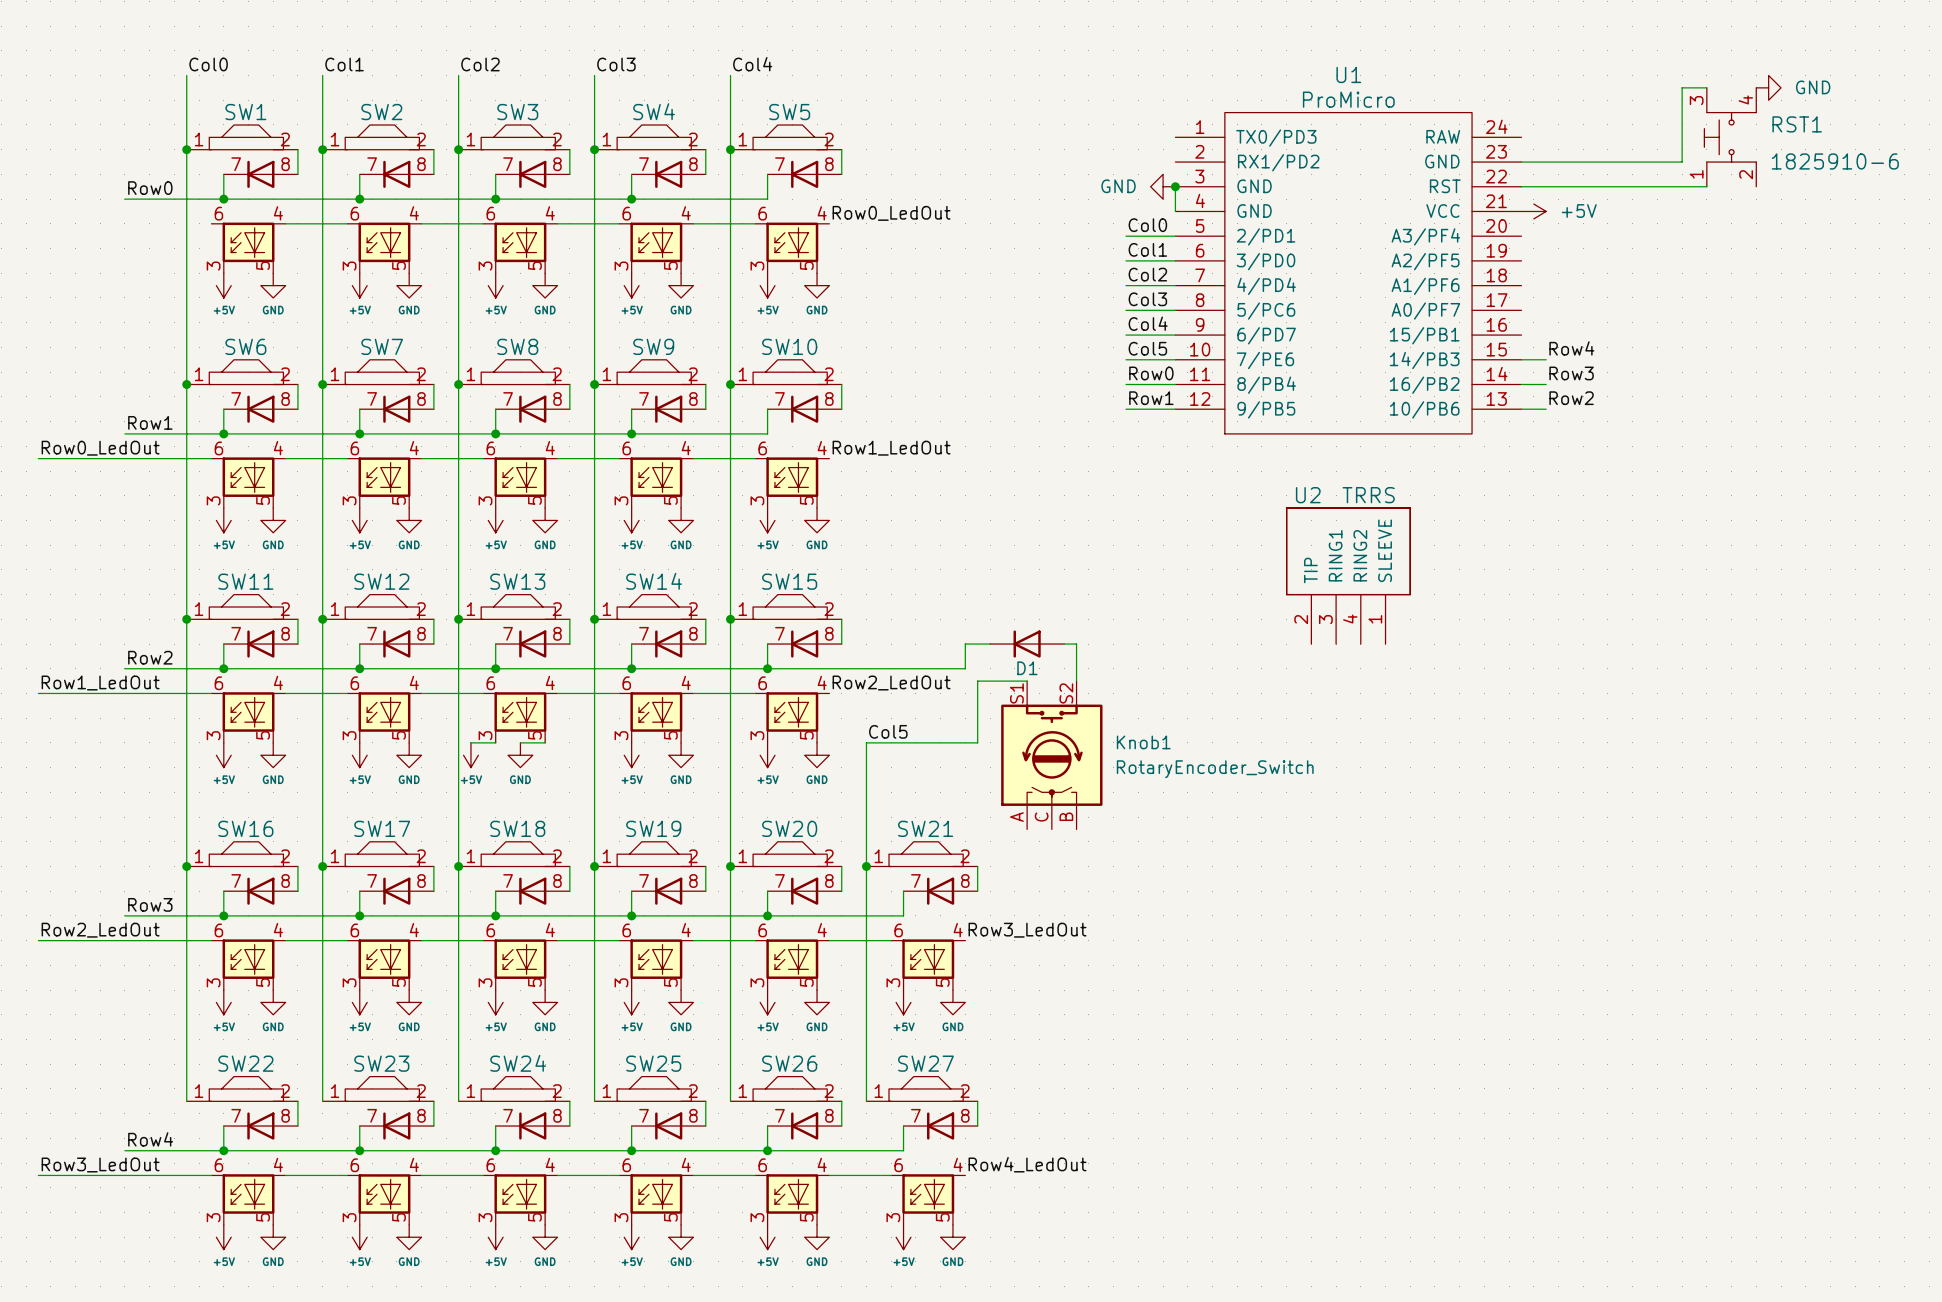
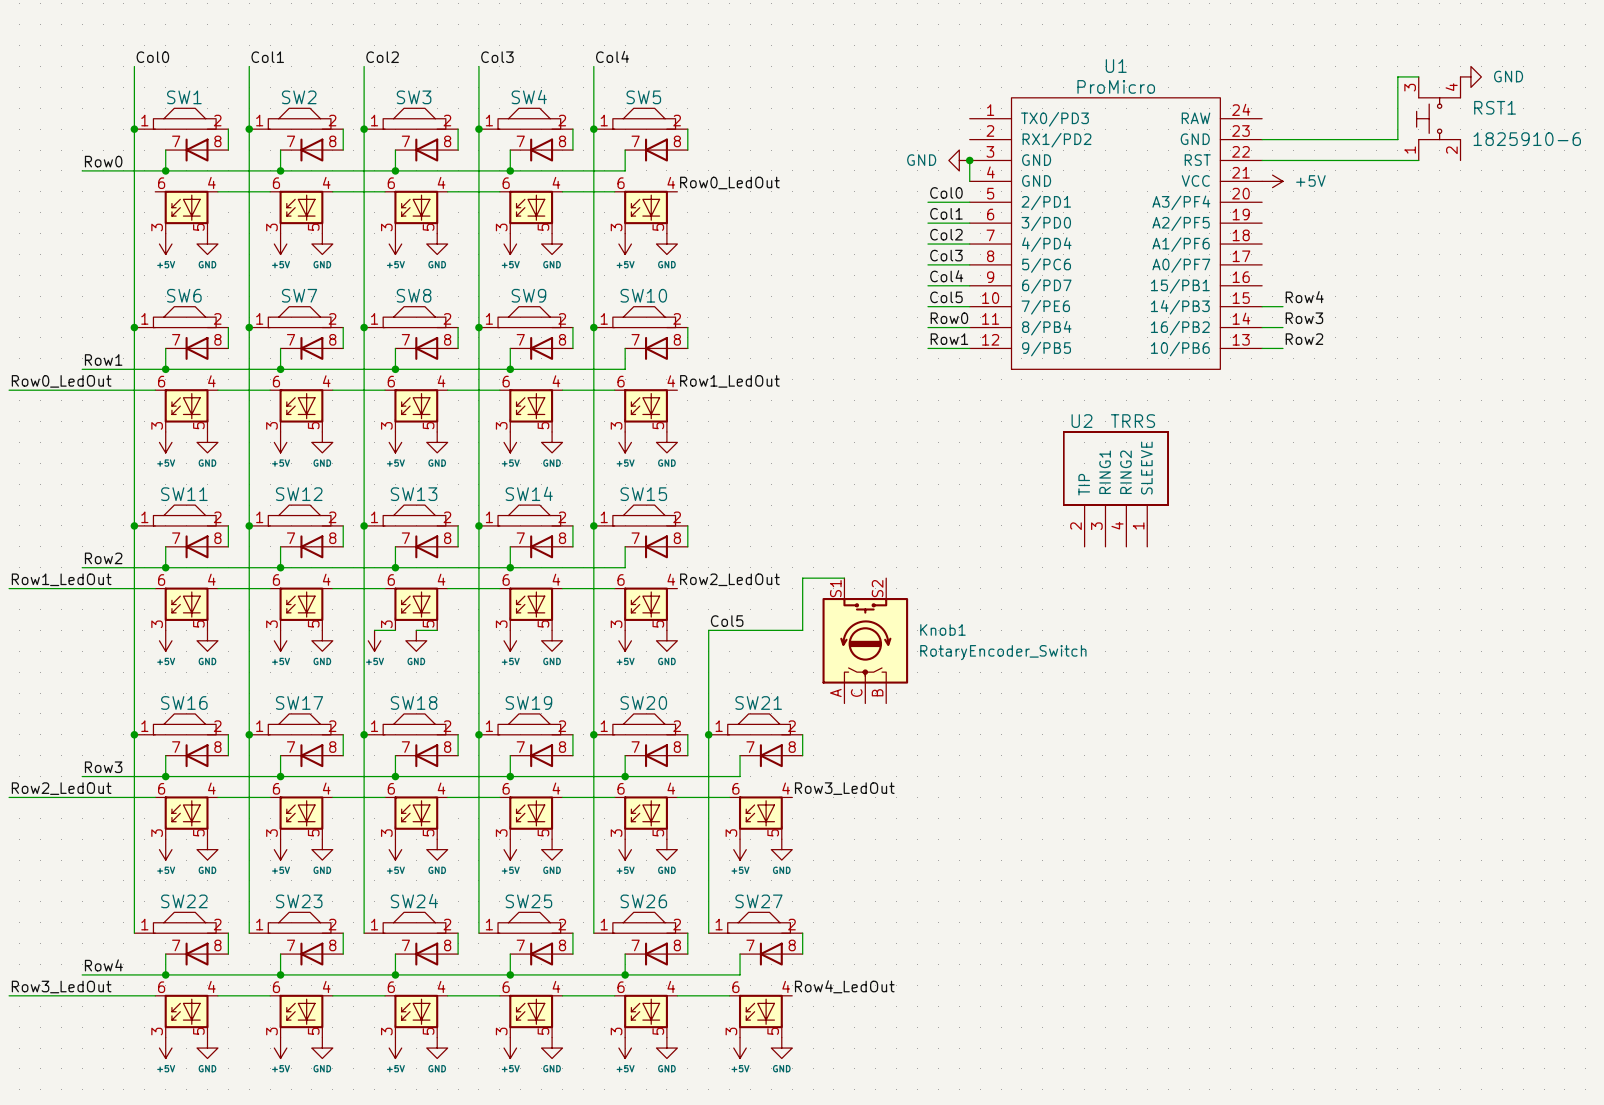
wire: (990, 644) (965, 644) (965, 668) (767, 668) -> none
D1: (1027, 644) -> none
wire: (1064, 644) (1076, 644) (1076, 681) -> none
junction: (767, 668) -> none

